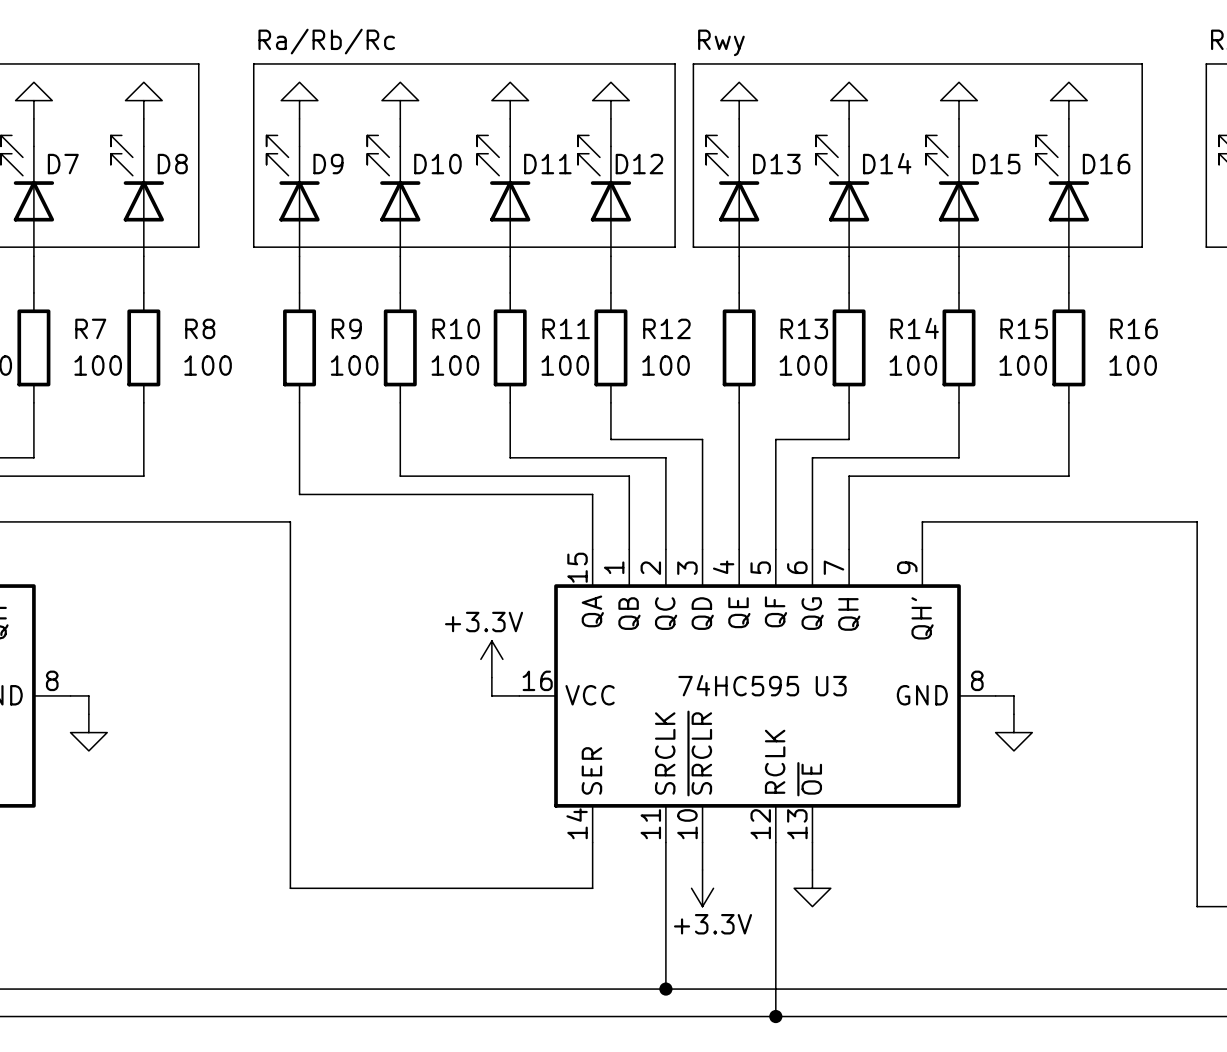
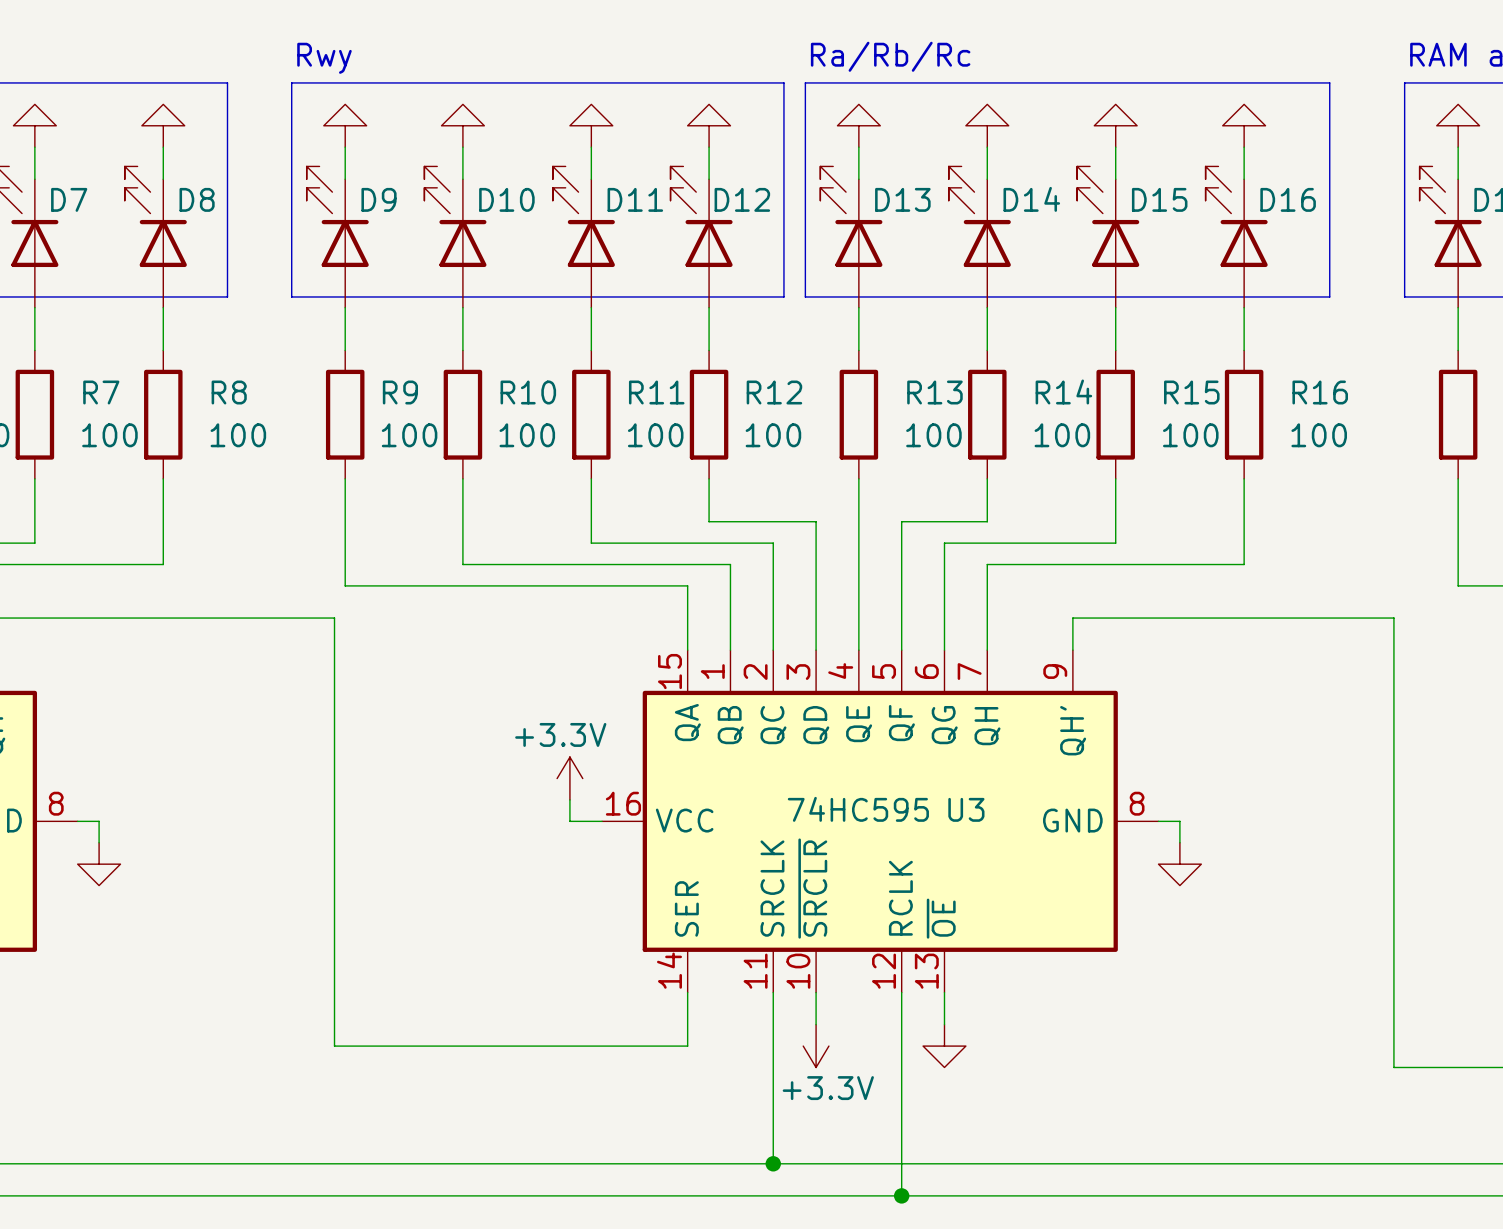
text: Ra/Rb/Rc (326, 41) -> Rwy (324, 58)
text: Rwy (721, 42) -> Ra/Rb/Rc (890, 56)

